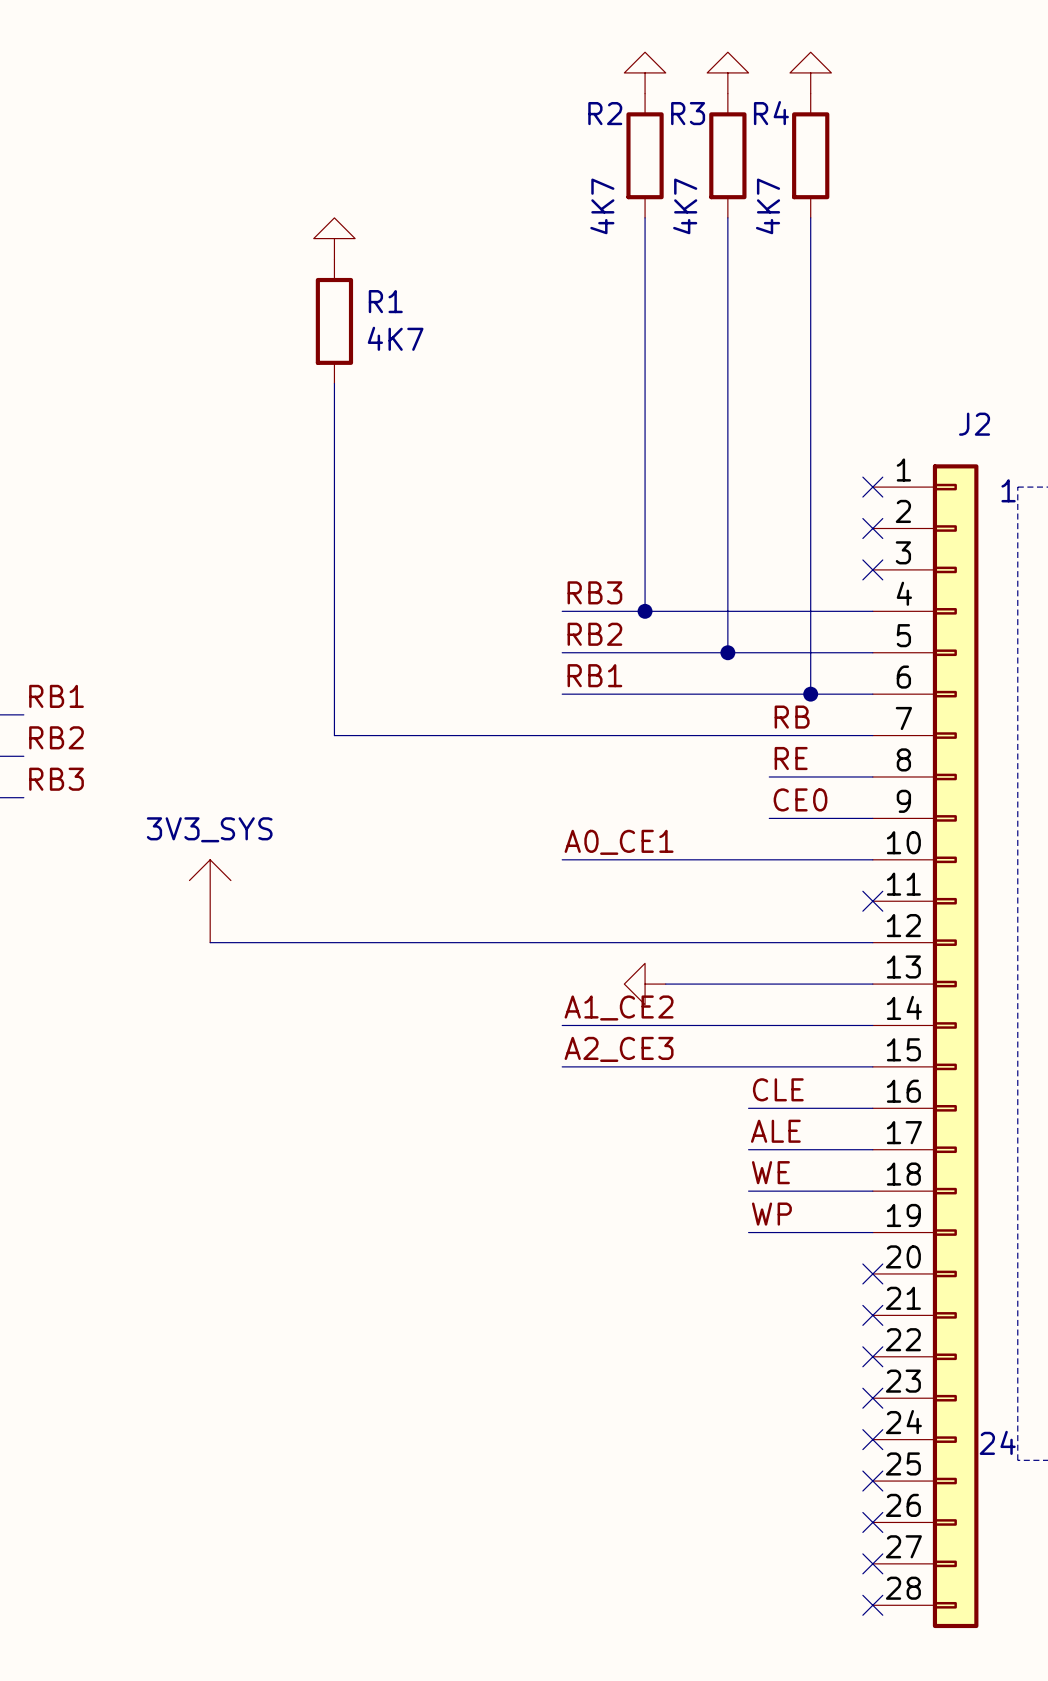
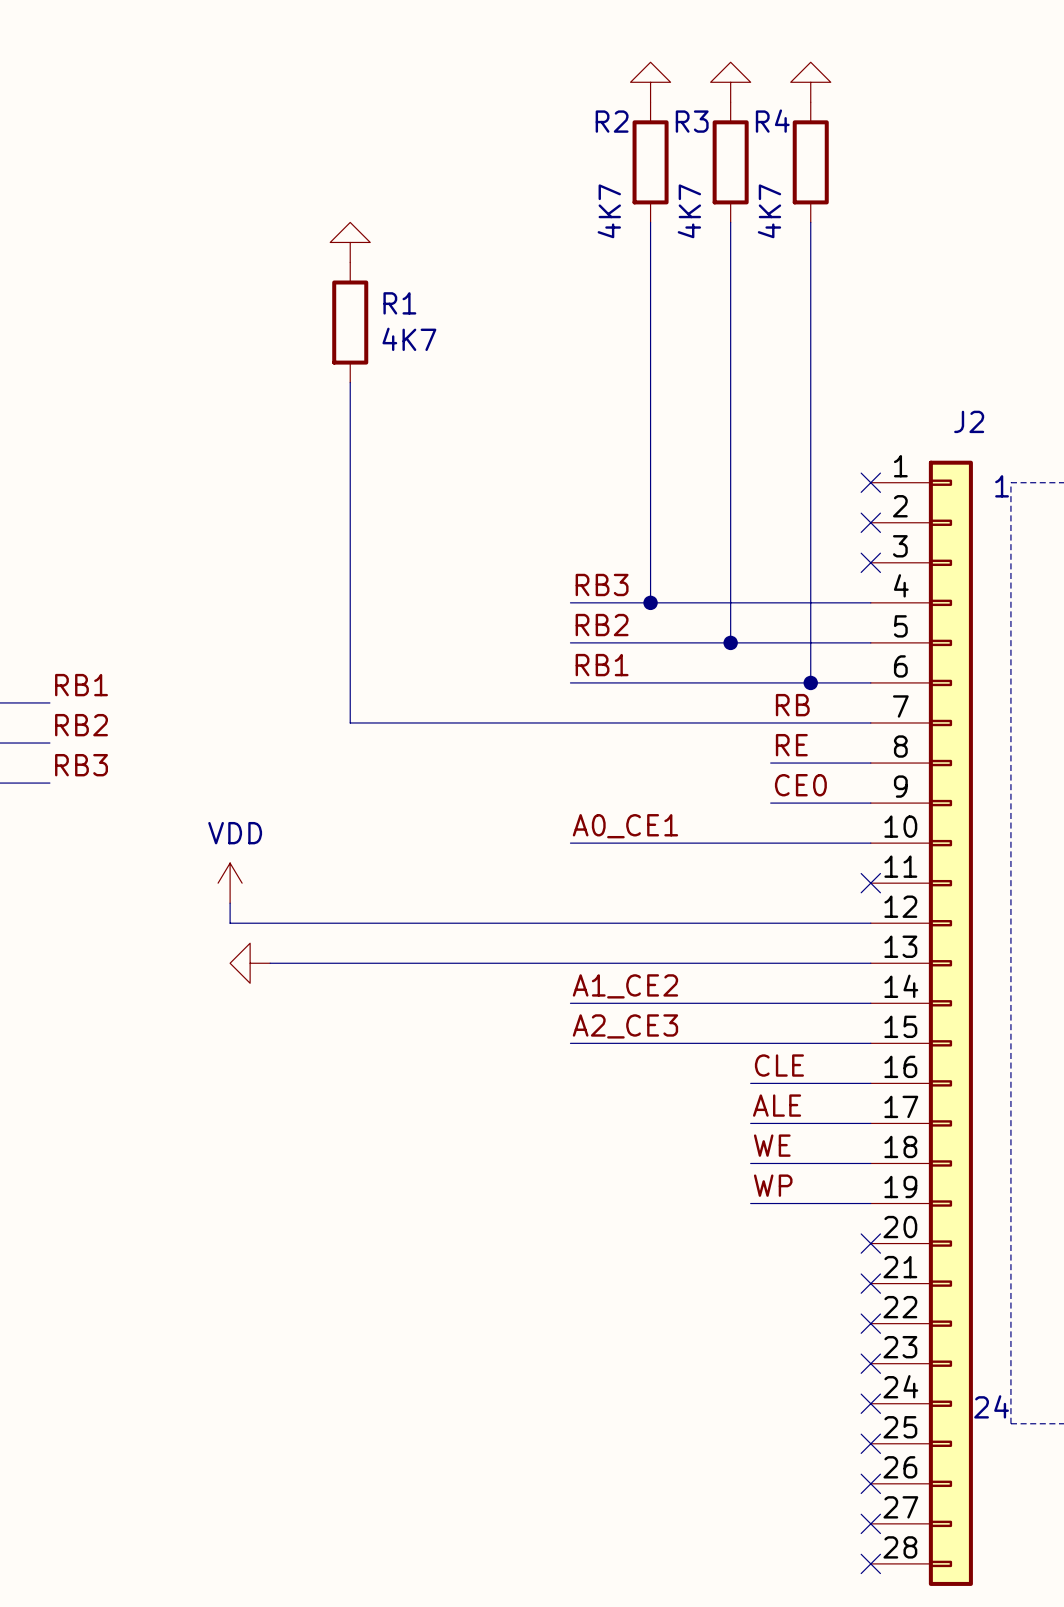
power symbol: 3V3_SYS (210, 901) -> VDD (230, 883)
power symbol: none -> (250, 963)
wire: none -> (270, 963) (670, 963)
power symbol: (645, 984) -> none

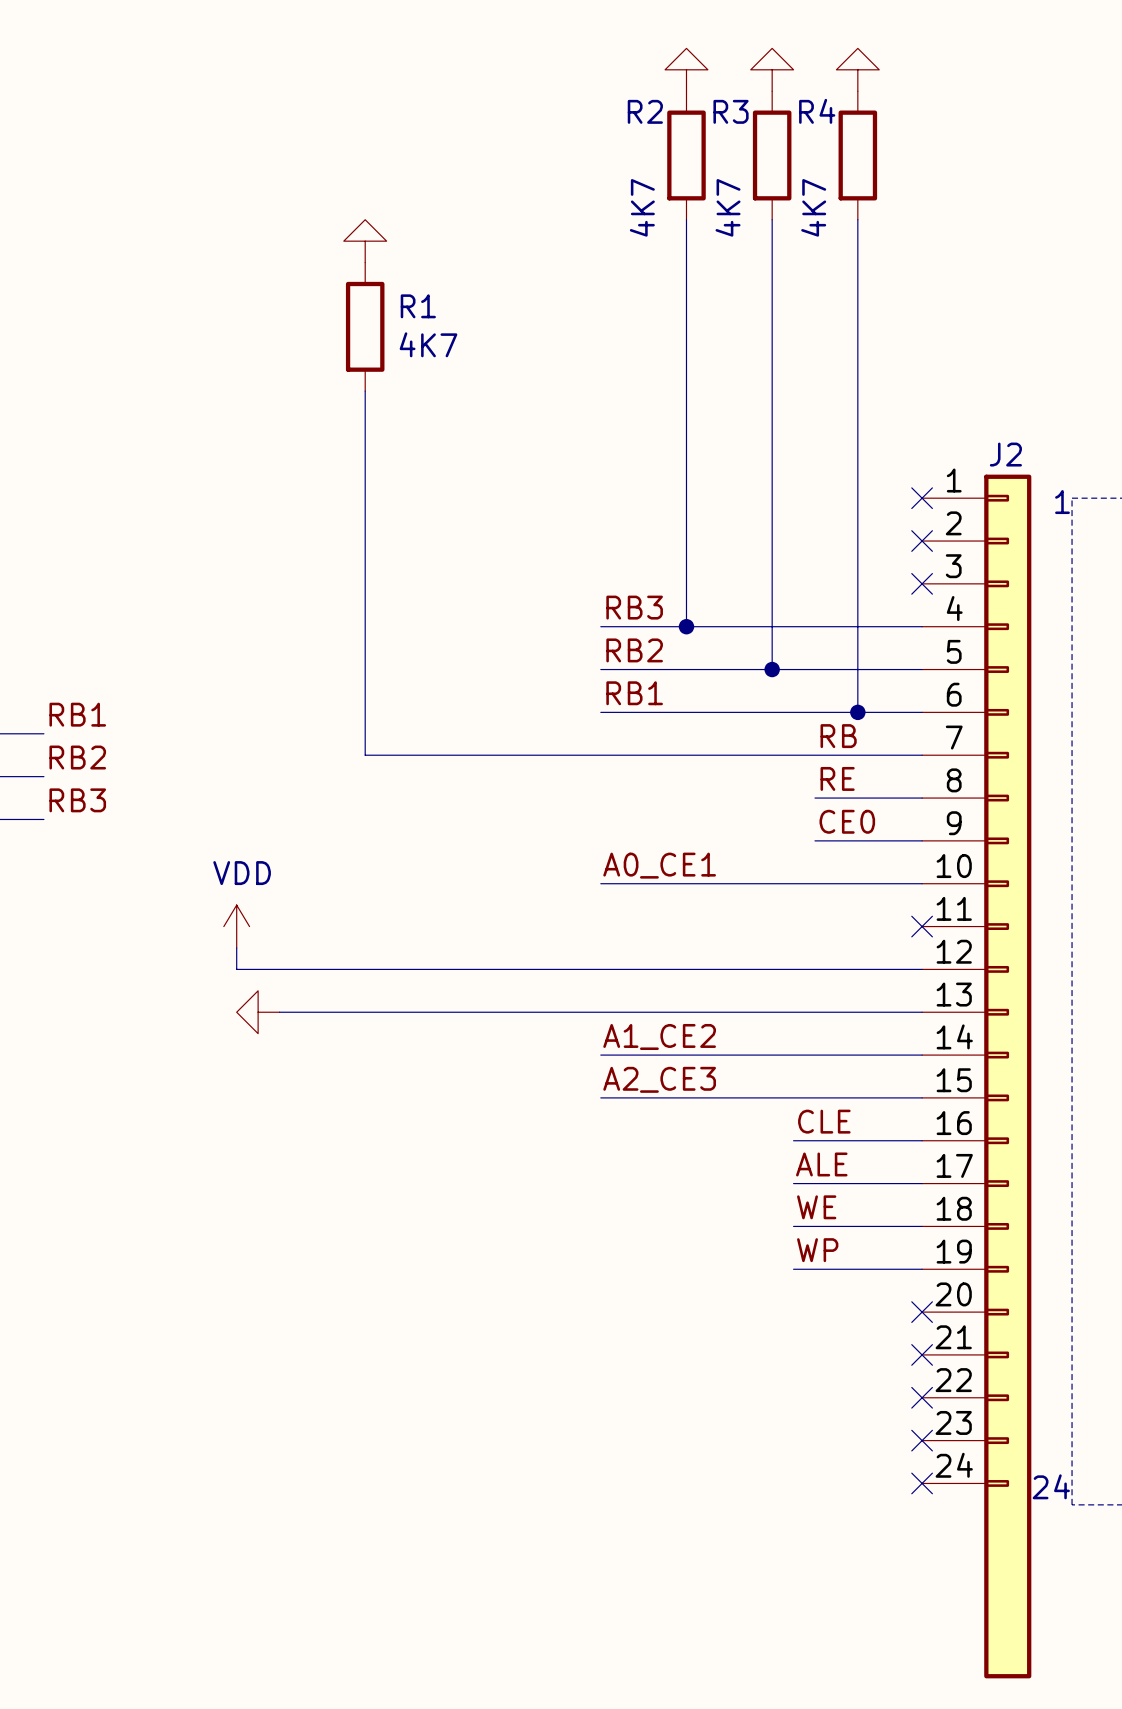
J2 symbol: [870, 460, 973, 1586] -> [922, 474, 1032, 1679]
no-connect mark: (870, 1443) -> none
no-connect mark: (870, 1483) -> none
no-connect mark: (870, 1523) -> none
no-connect mark: (870, 1563) -> none

